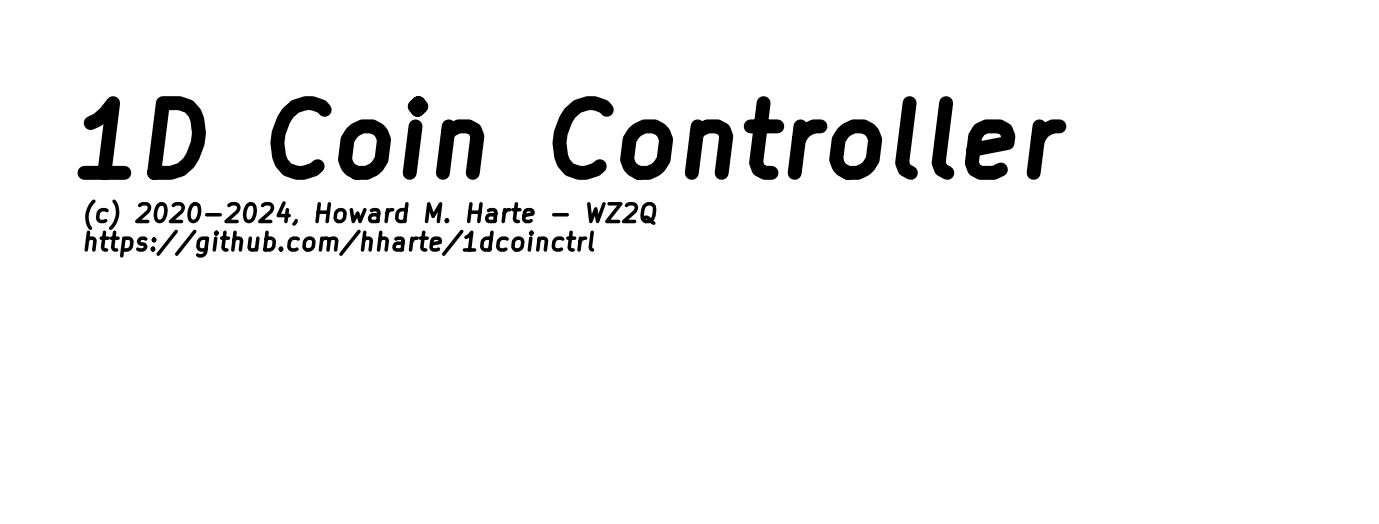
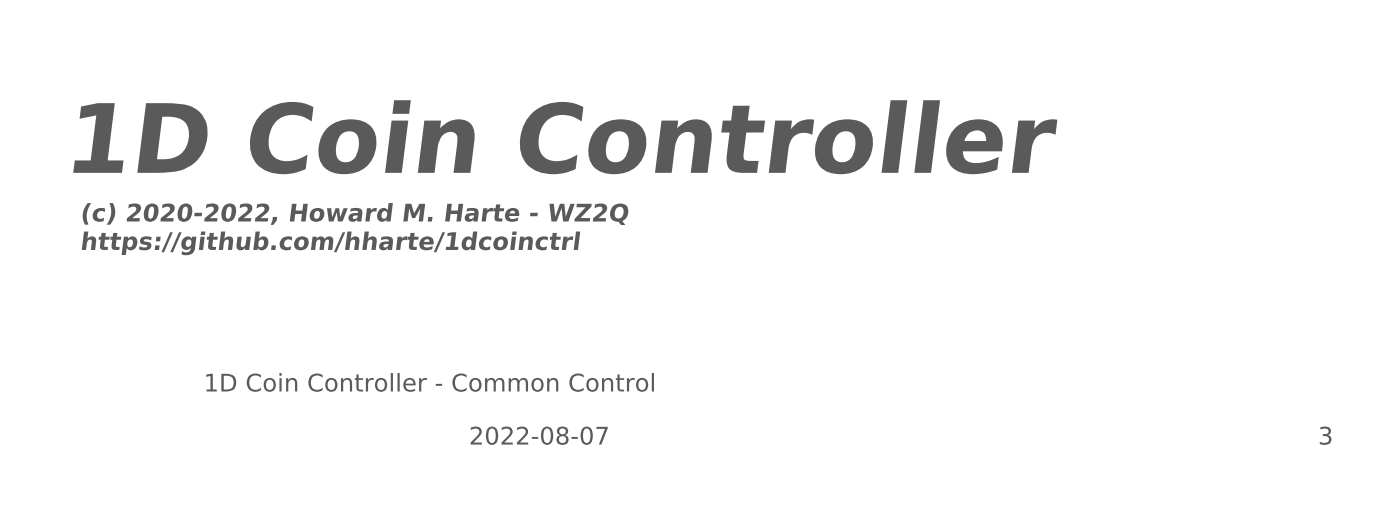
text: (c) 2020-2024, Howard M. Harte - WZ2Q (370, 214) -> (c) 2020-2022, Howard M. Harte - WZ2Q (355, 214)
text: none -> 1D Coin Controller - Common Control (430, 382)
text: none -> 2022-08-07 (539, 435)
text: none -> 3 (1325, 435)

